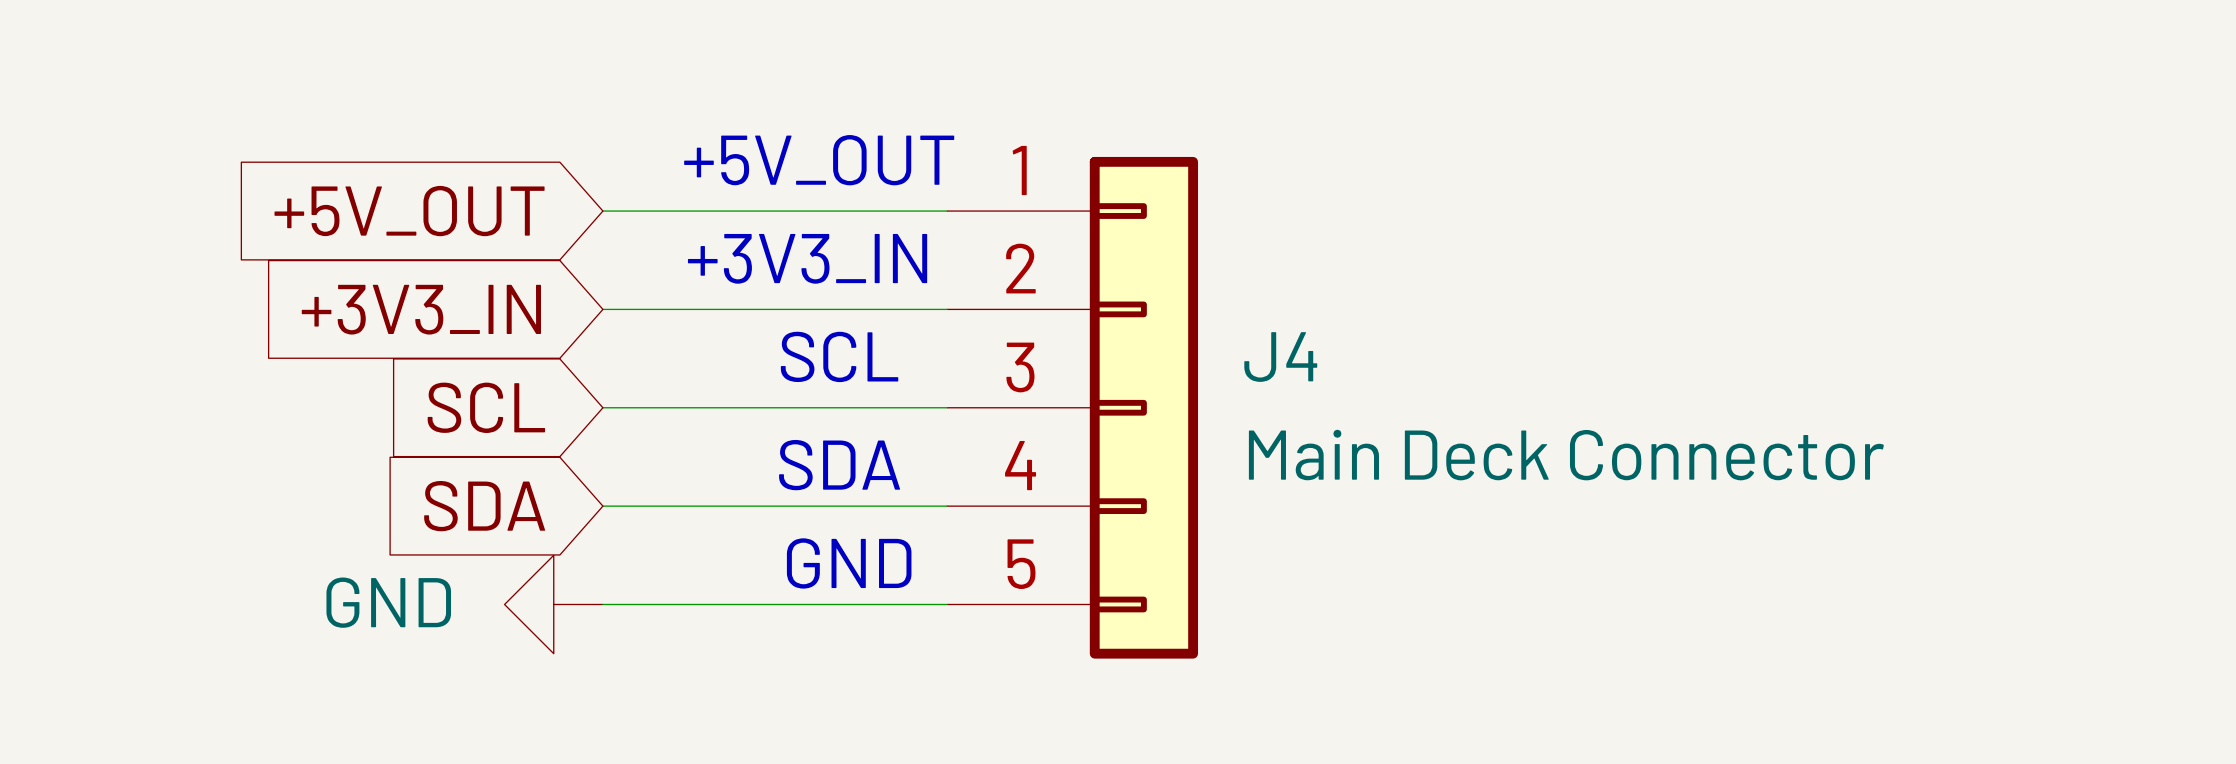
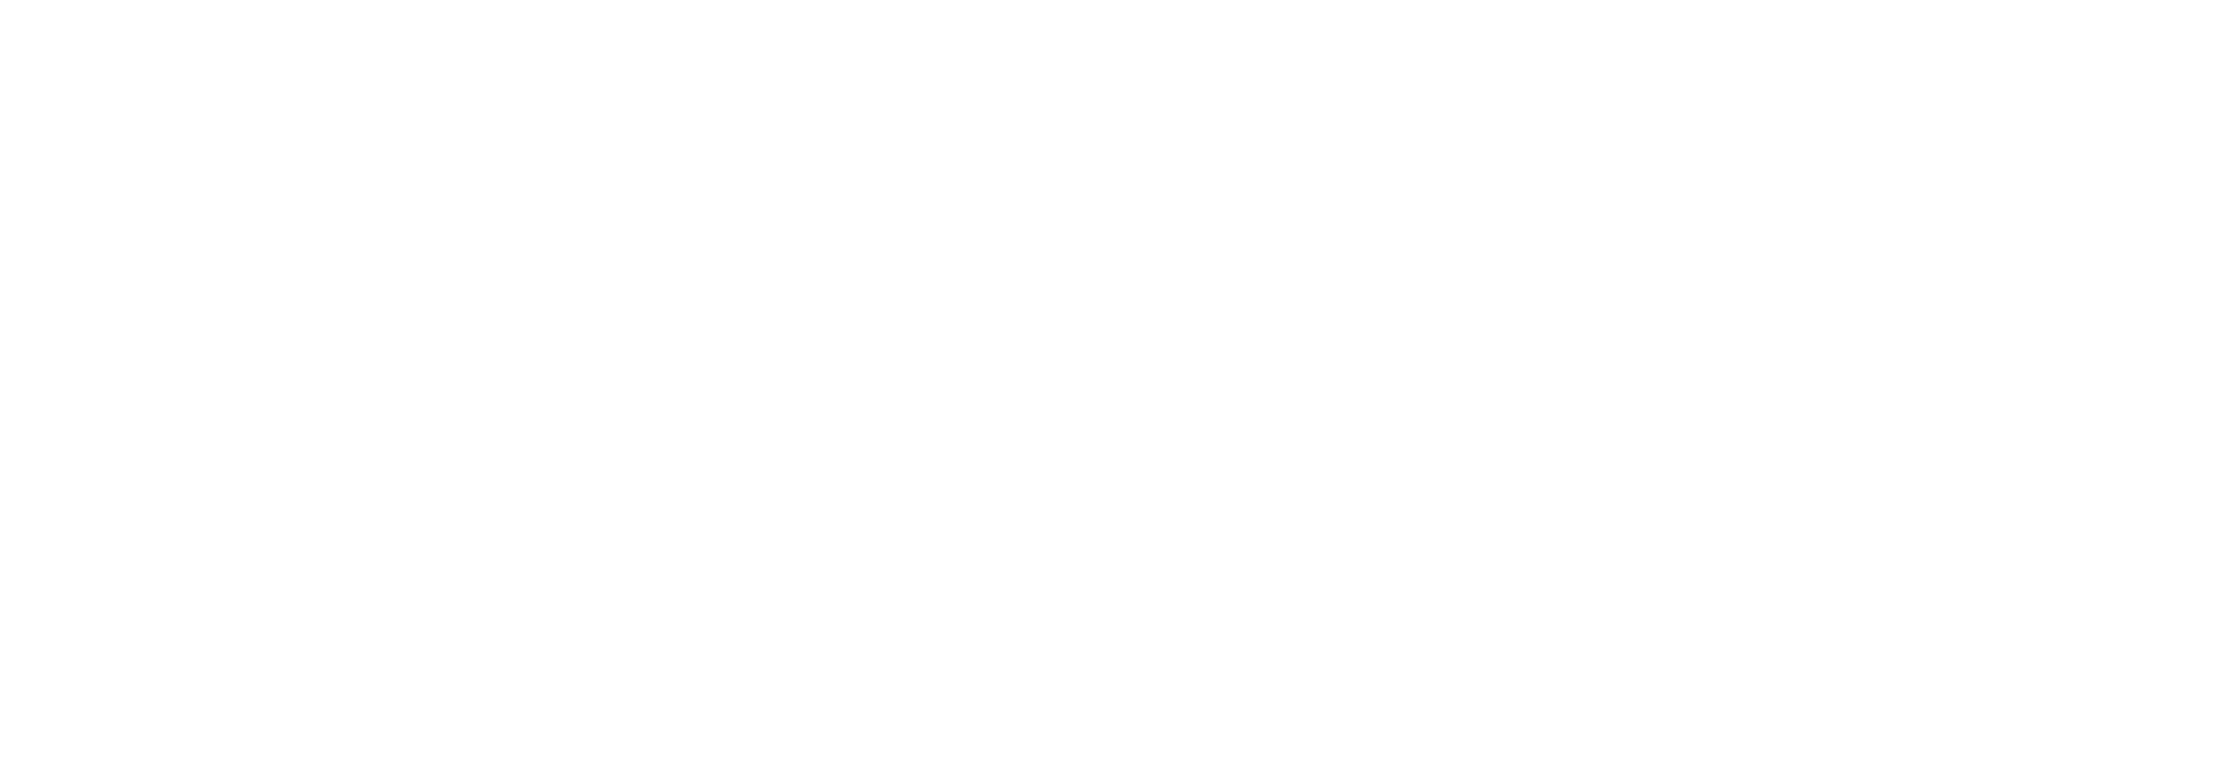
text: +5V_OUT (819, 160) -> none
global label: +5V_OUT (409, 211) -> none
wire: (602, 211) (947, 211) -> none
text: +3V3_IN (807, 258) -> none
global label: +3V3_IN (421, 309) -> none
wire: (602, 309) (947, 309) -> none
text: SCL (839, 356) -> none
global label: SCL (486, 407) -> none
wire: (602, 407) (947, 407) -> none
J4: Main Deck Connector (1072, 407) -> none
text: SDA (839, 465) -> none
global label: SDA (484, 506) -> none
wire: (602, 506) (947, 506) -> none
text: GND (849, 563) -> none
power symbol: GND (553, 604) -> none
wire: (602, 604) (947, 604) -> none

